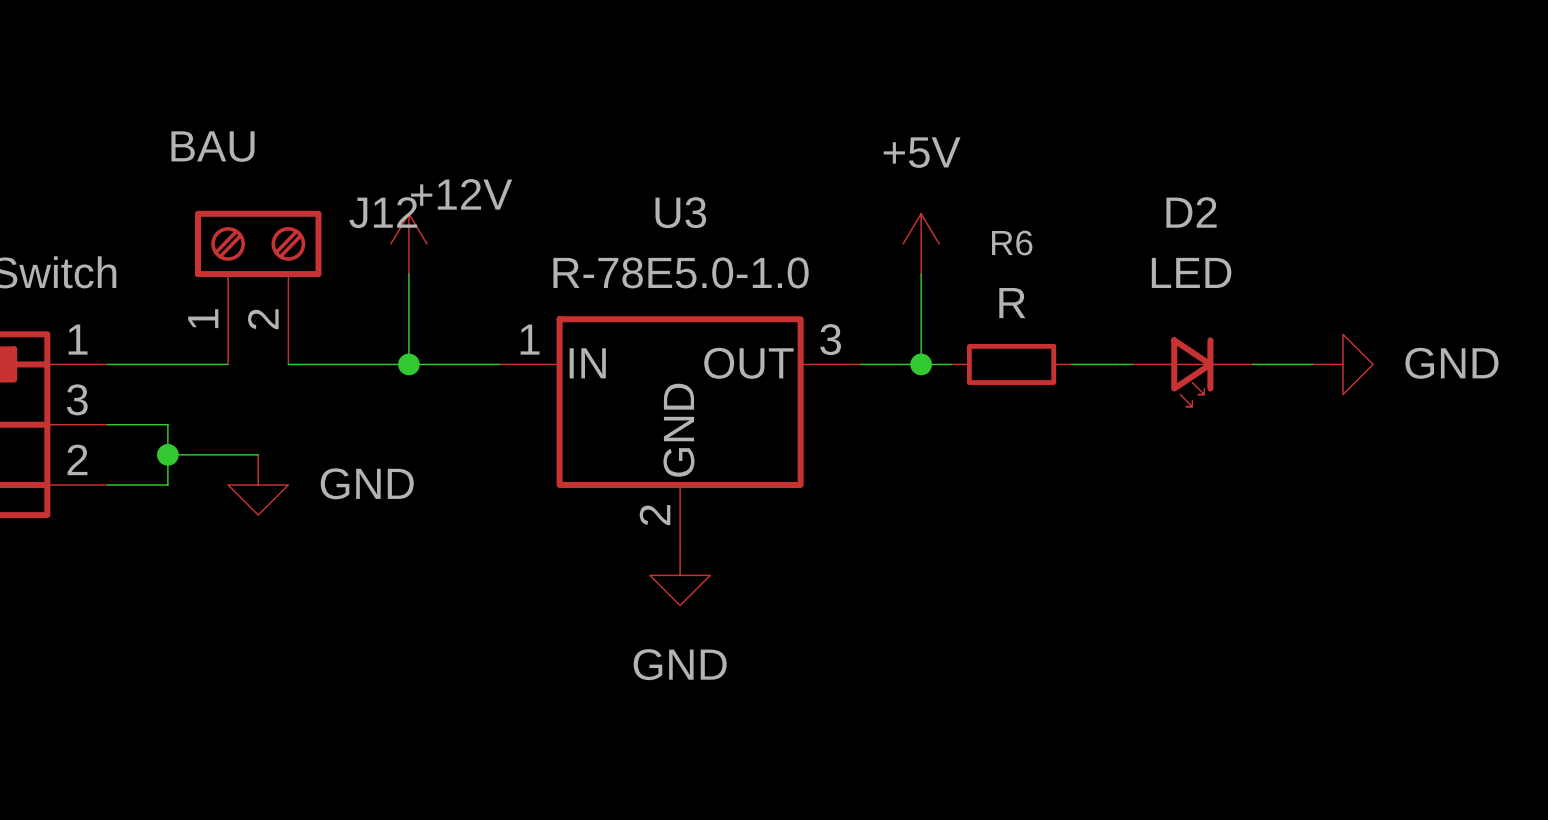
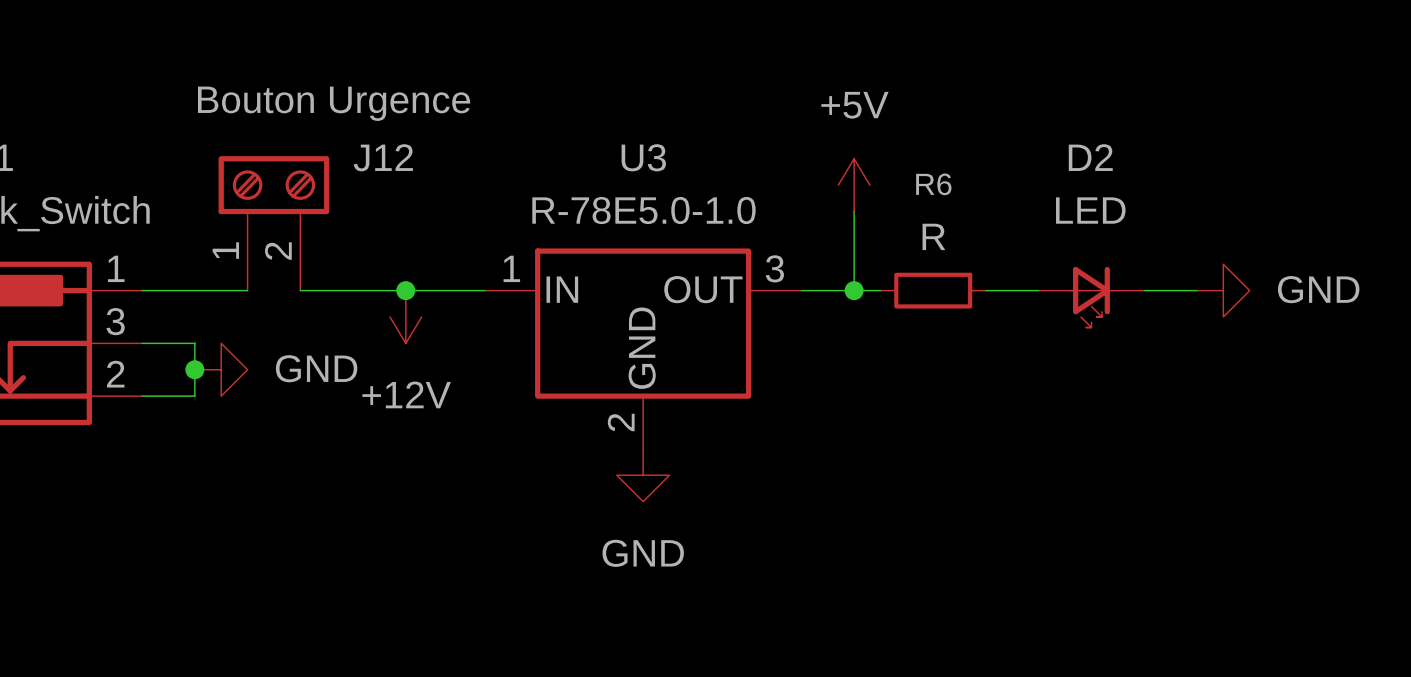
J12 value: BAU (213, 146) -> Bouton Urgence (334, 103)
power symbol text position: +12V (461, 194) -> +12V (406, 394)
power symbol rotation: 0° (408, 243) -> 180° (405, 317)
power symbol position: +12V (408, 243) -> +12V (405, 317)
wire: (408, 274) (408, 364) -> none
wire: (167, 454) (258, 454) -> none
power symbol rotation: 0° (258, 484) -> 90° counterclockwise (221, 369)
power symbol position: GND (258, 484) -> GND (221, 369)

